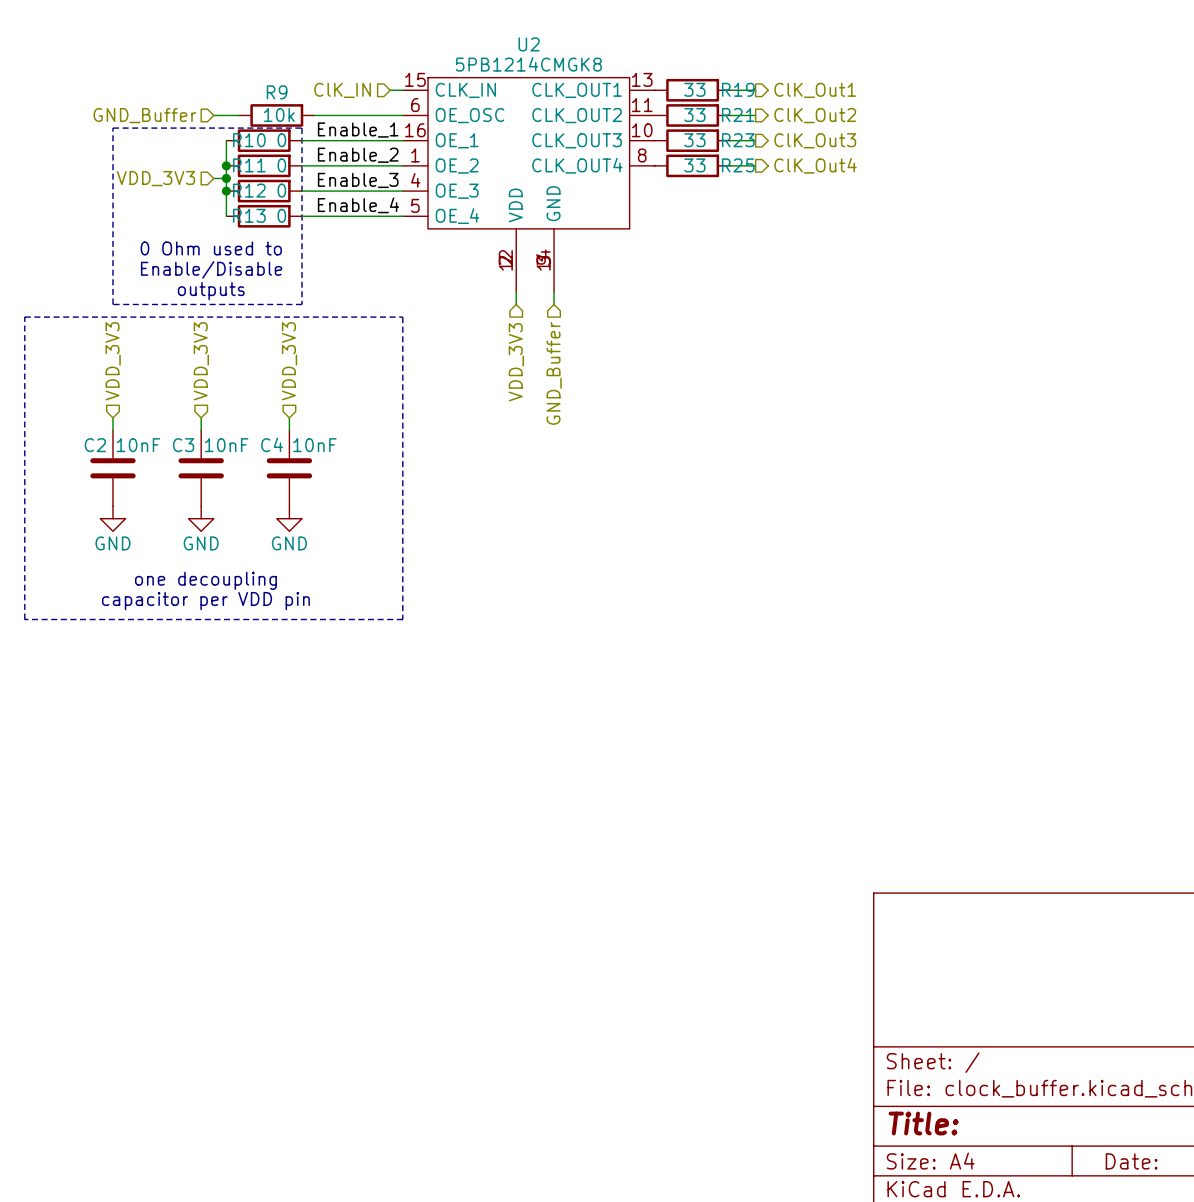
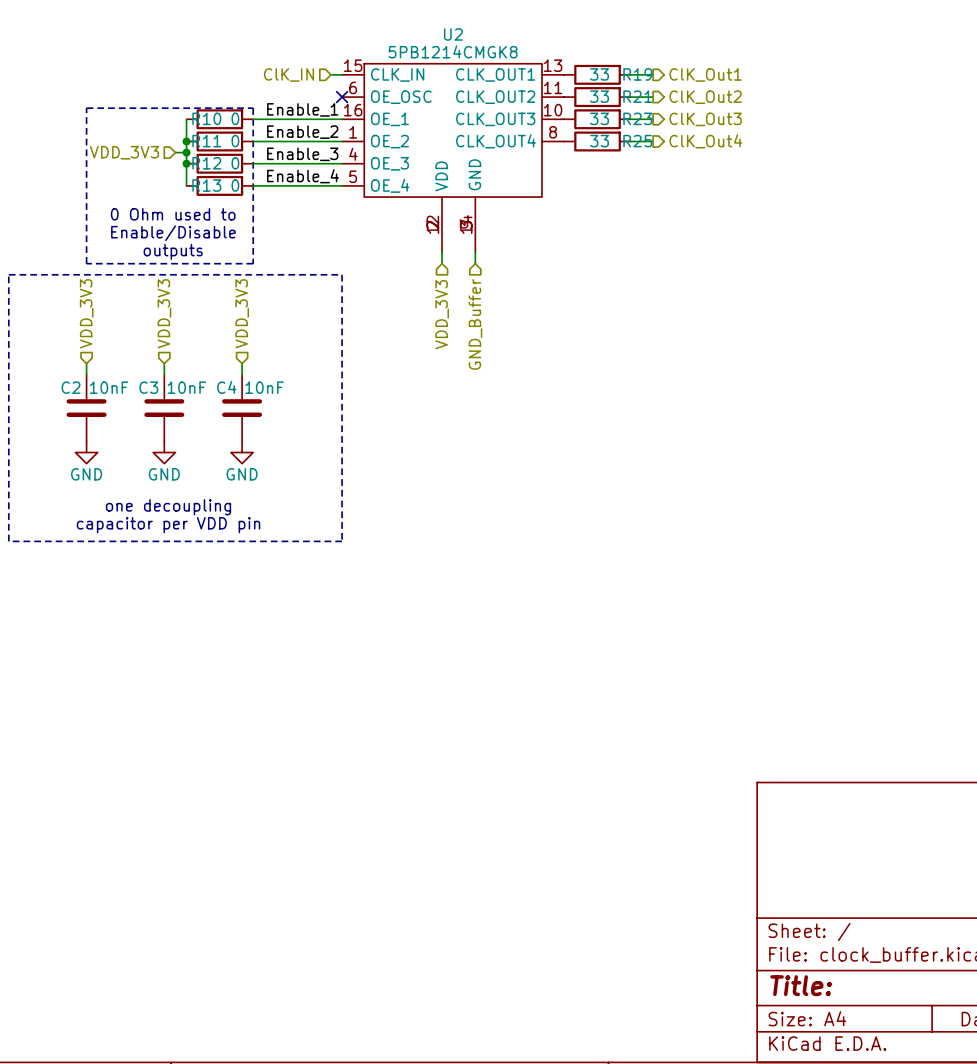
hierarchical label: GND_Buffer (144, 115) -> none
wire: (213, 115) (238, 115) -> none
R9: 10k (276, 115) -> none
wire: (314, 115) (402, 115) -> none
no-connect mark: none -> (342, 97)

